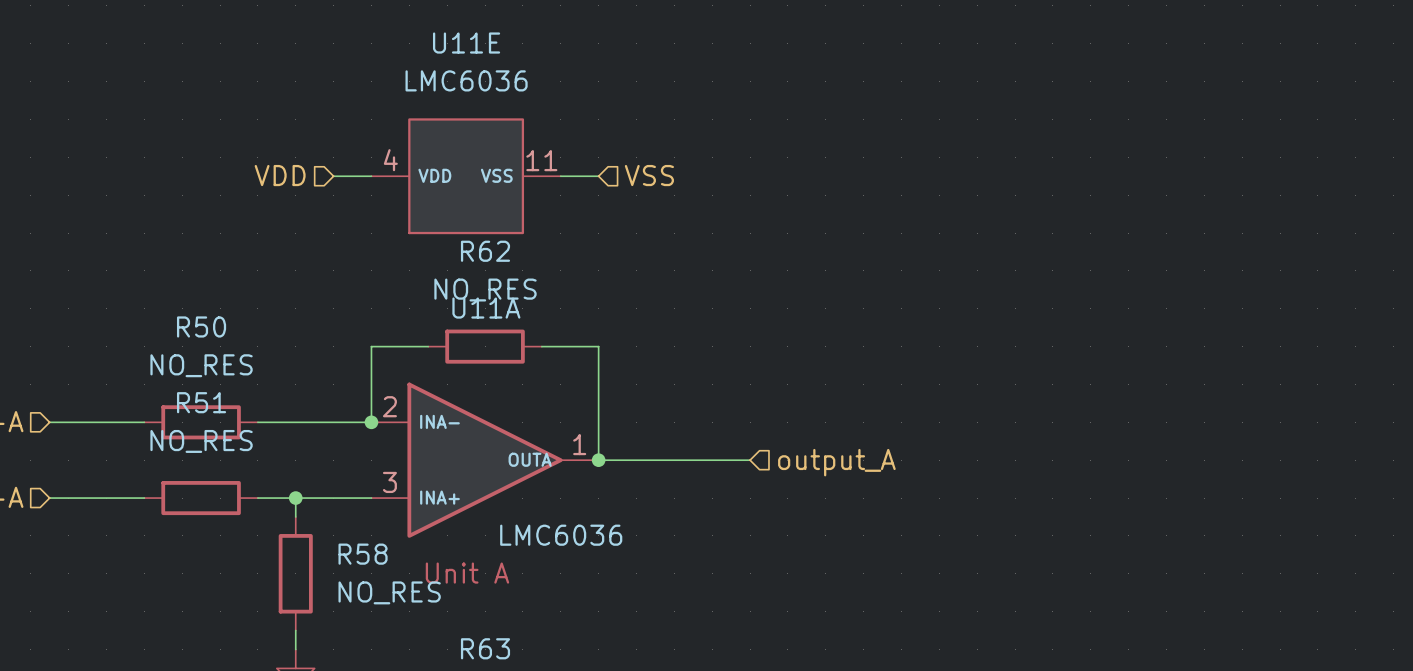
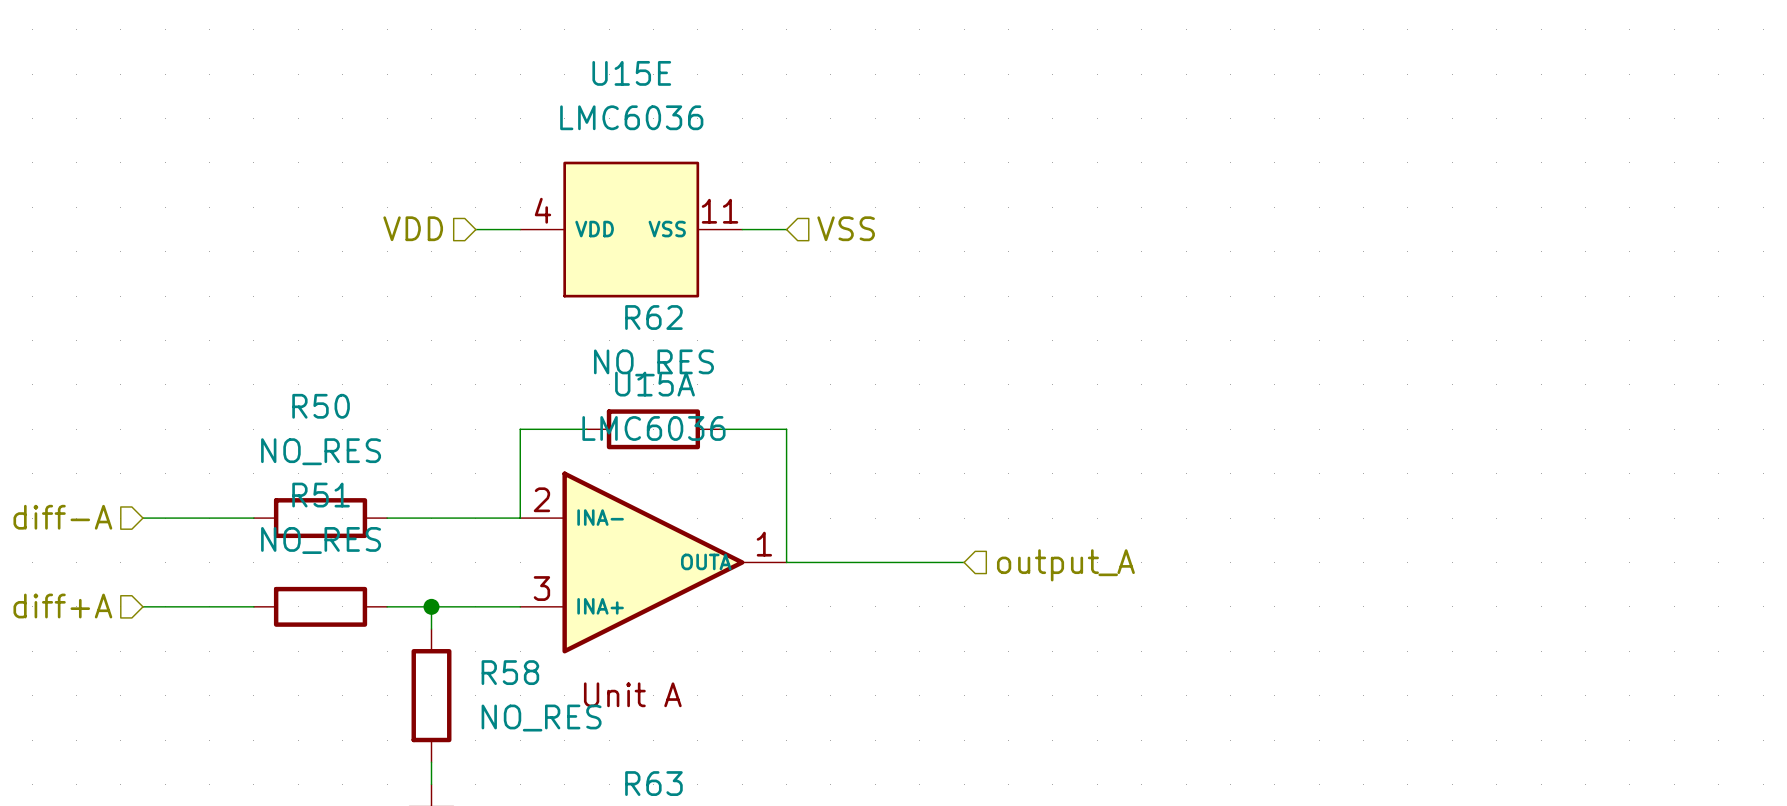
U11E name: U11E (466, 43) -> U15E (631, 73)
U11A name: U11A (486, 308) -> U15A (655, 384)
junction: (371, 422) -> none
junction: (598, 460) -> none
U11A value position: LMC6036 (561, 535) -> LMC6036 (653, 428)

